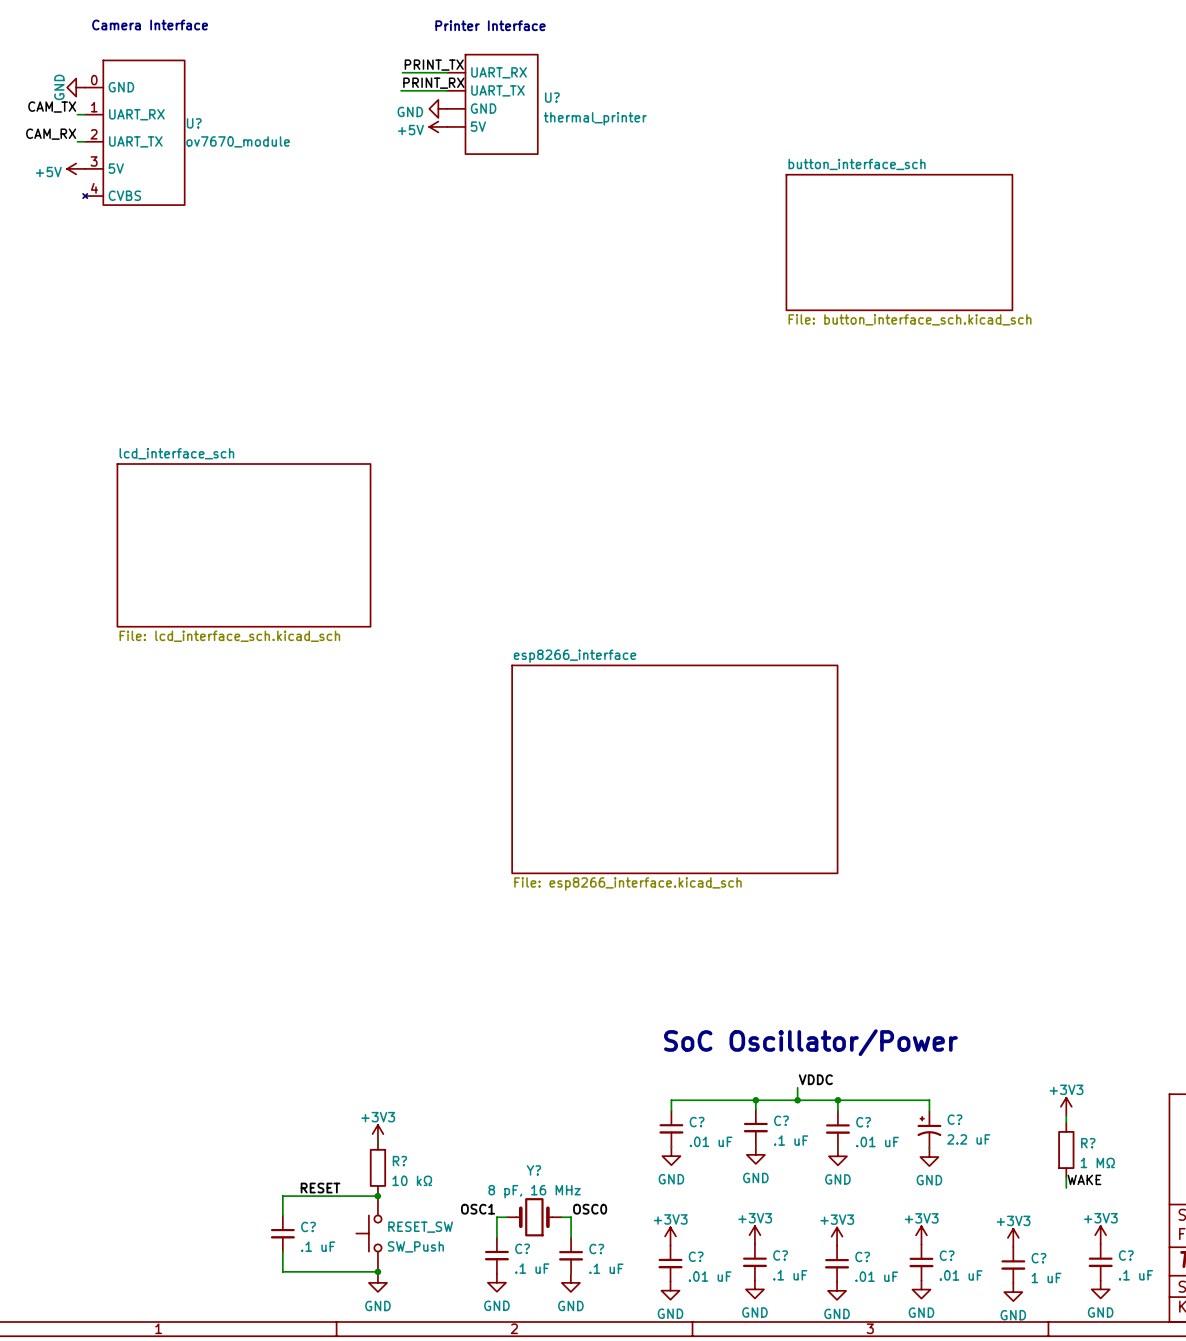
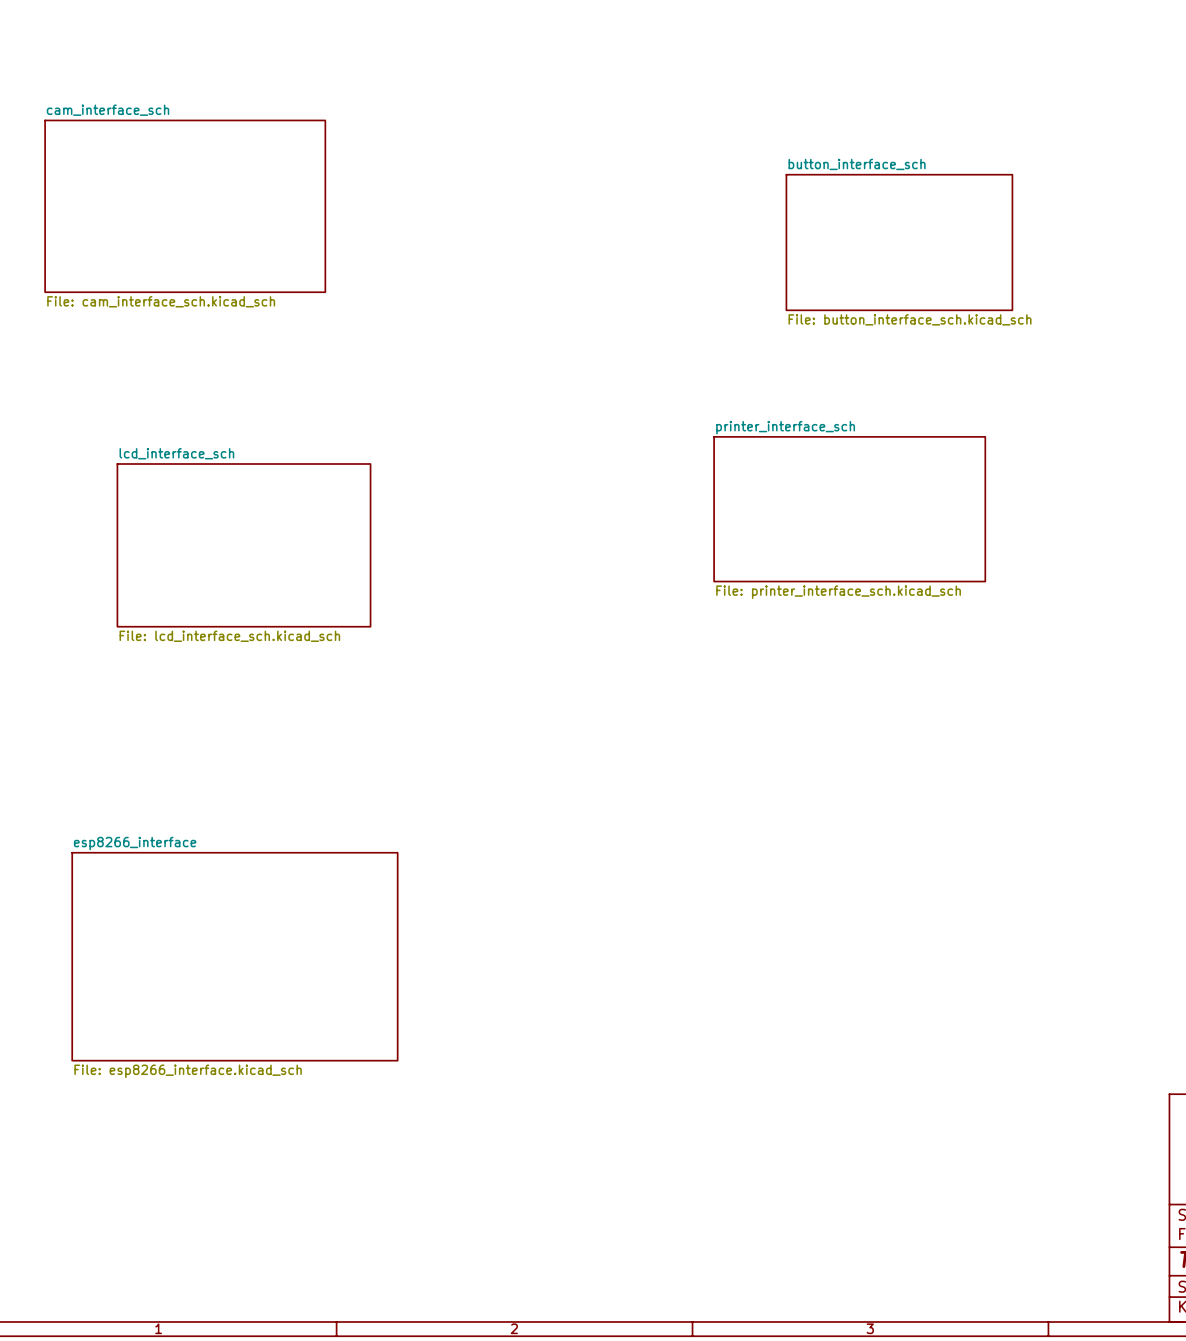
text: Camera Interface (150, 25) -> none
text: Printer Interface (490, 25) -> none
label: PRINT_TX (434, 65) -> none
wire: (402, 72) (447, 72) -> none
label: PRINT_RX (433, 83) -> none
power symbol: GND (76, 87) -> none
wire: (401, 90) (447, 90) -> none
U?: thermal_printer (492, 104) -> none
label: CAM_TX (52, 107) -> none
power symbol: GND (438, 108) -> none
wire: (77, 114) (85, 114) -> none
power symbol: +5V (438, 126) -> none
U?: ov7670_module (134, 132) -> none
label: CAM_RX (51, 134) -> none
wire: (77, 141) (85, 141) -> none
power symbol: +5V (76, 168) -> none
sheet cam_interface_sch: none -> File: cam_interface_sch.kicad_sch (185, 206)
sheet printer_interface_sch: none -> File: printer_interface_sch.kicad_sch (849, 509)
sheet esp8266_interface position: (674, 769) -> (234, 956)
text: SoC Oscillator/Power (810, 1042) -> none
label: VDDC (815, 1079) -> none
wire: (797, 1087) (797, 1100) -> none
wire: (755, 1100) (755, 1109) -> none
junction: (755, 1100) -> none
junction: (797, 1100) -> none
wire: (837, 1100) (837, 1110) -> none
junction: (837, 1100) -> none
power symbol: +3V3 (1066, 1106) -> none
wire: (671, 1110) (671, 1100) (929, 1100) (929, 1111) -> none
wire: (1066, 1115) (1066, 1122) -> none
C?: .1 uF (755, 1127) -> none
C?: .01 uF (671, 1128) -> none
C?: .01 uF (837, 1129) -> none
C?: 2.2 uF (929, 1129) -> none
power symbol: +3V3 (377, 1134) -> none
wire: (377, 1140) (377, 1143) -> none
wire: (755, 1145) (755, 1145) -> none
wire: (671, 1146) (671, 1147) -> none
wire: (837, 1147) (837, 1147) -> none
wire: (929, 1147) (929, 1148) -> none
R?: 1 MΩ (1066, 1149) -> none
power symbol: GND (755, 1154) -> none
power symbol: GND (671, 1156) -> none
power symbol: GND (837, 1156) -> none
power symbol: GND (929, 1157) -> none
R?: 10 kΩ (377, 1167) -> none
wire: (1066, 1177) (1066, 1187) -> none
label: WAKE (1084, 1179) -> none
label: RESET (320, 1188) -> none
wire: (377, 1196) (282, 1196) (282, 1215) -> none
junction: (377, 1196) -> none
label: OSC1 (478, 1209) -> none
label: OSC0 (590, 1209) -> none
wire: (507, 1217) (496, 1217) (496, 1237) -> none
Y?: 8 pF, 16 MHz (534, 1217) -> none
wire: (561, 1217) (571, 1217) (571, 1237) -> none
C?: .1 uF (282, 1233) -> none
RESET_SW: SW_Push (368, 1233) -> none
power symbol: +3V3 (754, 1235) -> none
power symbol: +3V3 (921, 1235) -> none
power symbol: +3V3 (1100, 1235) -> none
power symbol: +3V3 (670, 1236) -> none
power symbol: +3V3 (837, 1236) -> none
power symbol: +3V3 (1013, 1237) -> none
wire: (282, 1251) (282, 1271) (377, 1271) -> none
C?: .1 uF (496, 1255) -> none
C?: .1 uF (571, 1255) -> none
C?: .1 uF (754, 1262) -> none
C?: .01 uF (921, 1262) -> none
C?: .1 uF (1100, 1262) -> none
C?: .01 uF (670, 1263) -> none
C?: .01 uF (837, 1263) -> none
C?: 1 uF (1013, 1264) -> none
junction: (377, 1271) -> none
wire: (570, 1273) (571, 1273) -> none
power symbol: GND (377, 1282) -> none
power symbol: GND (496, 1282) -> none
power symbol: GND (570, 1282) -> none
power symbol: GND (754, 1289) -> none
power symbol: GND (921, 1289) -> none
power symbol: GND (1100, 1289) -> none
power symbol: GND (670, 1290) -> none
power symbol: GND (837, 1290) -> none
power symbol: GND (1013, 1292) -> none

